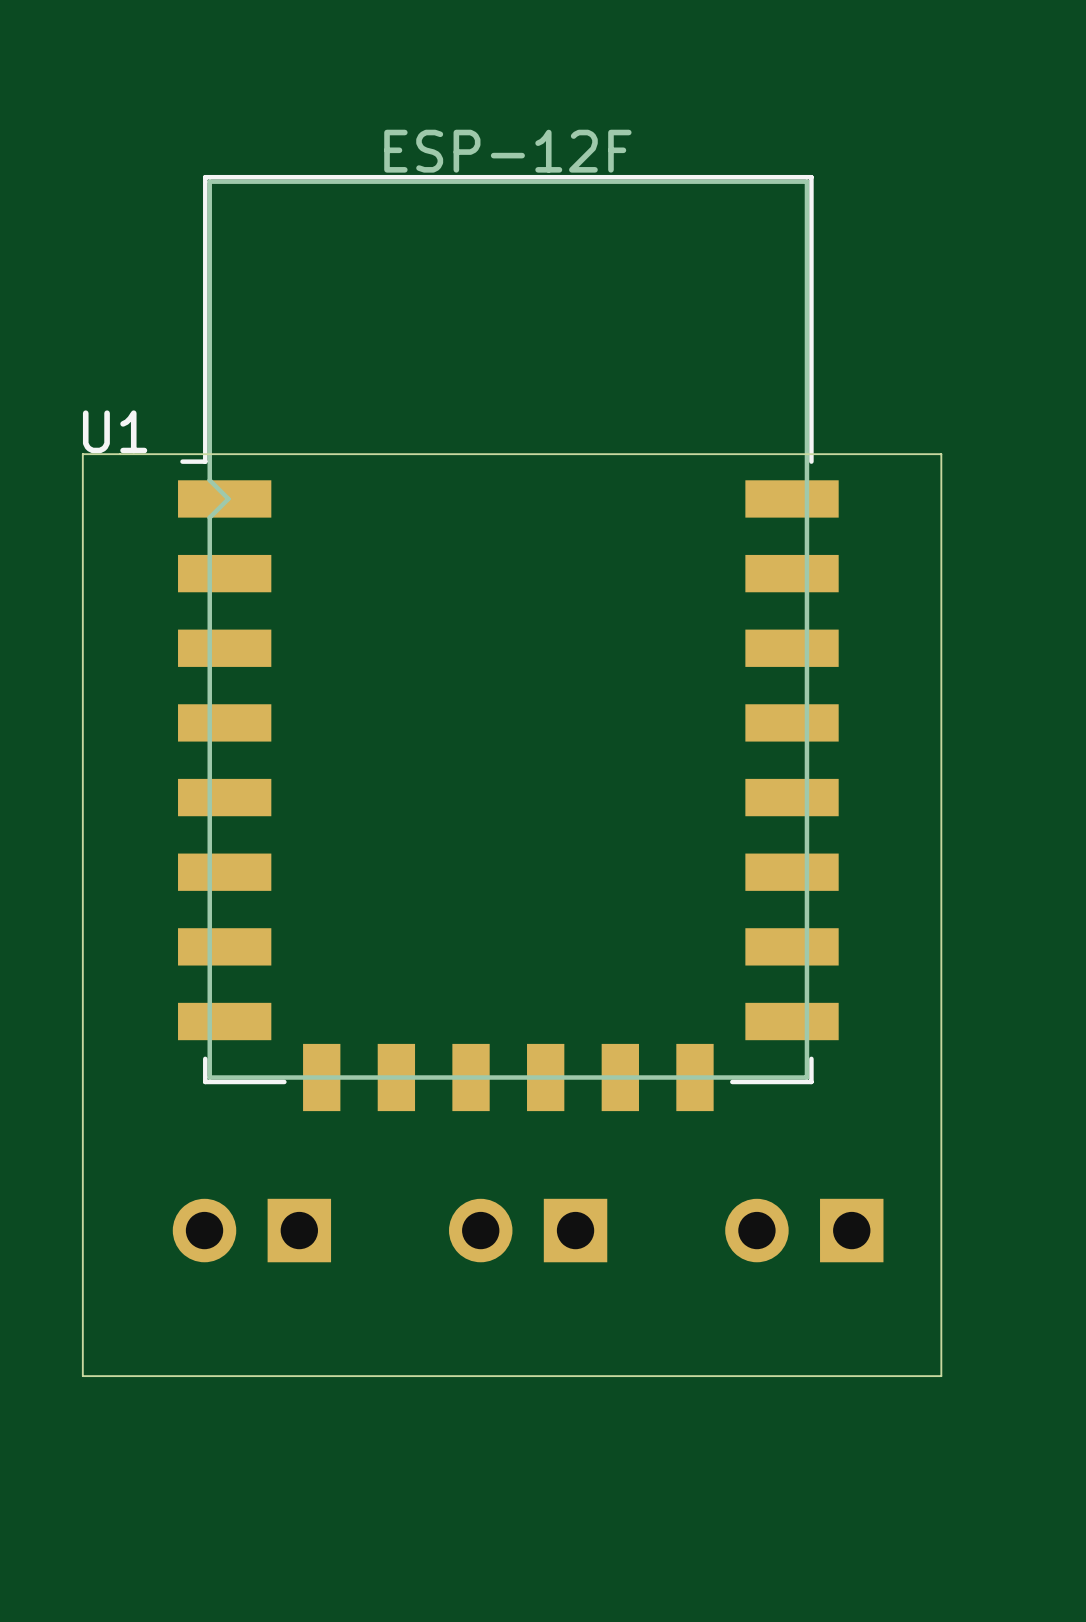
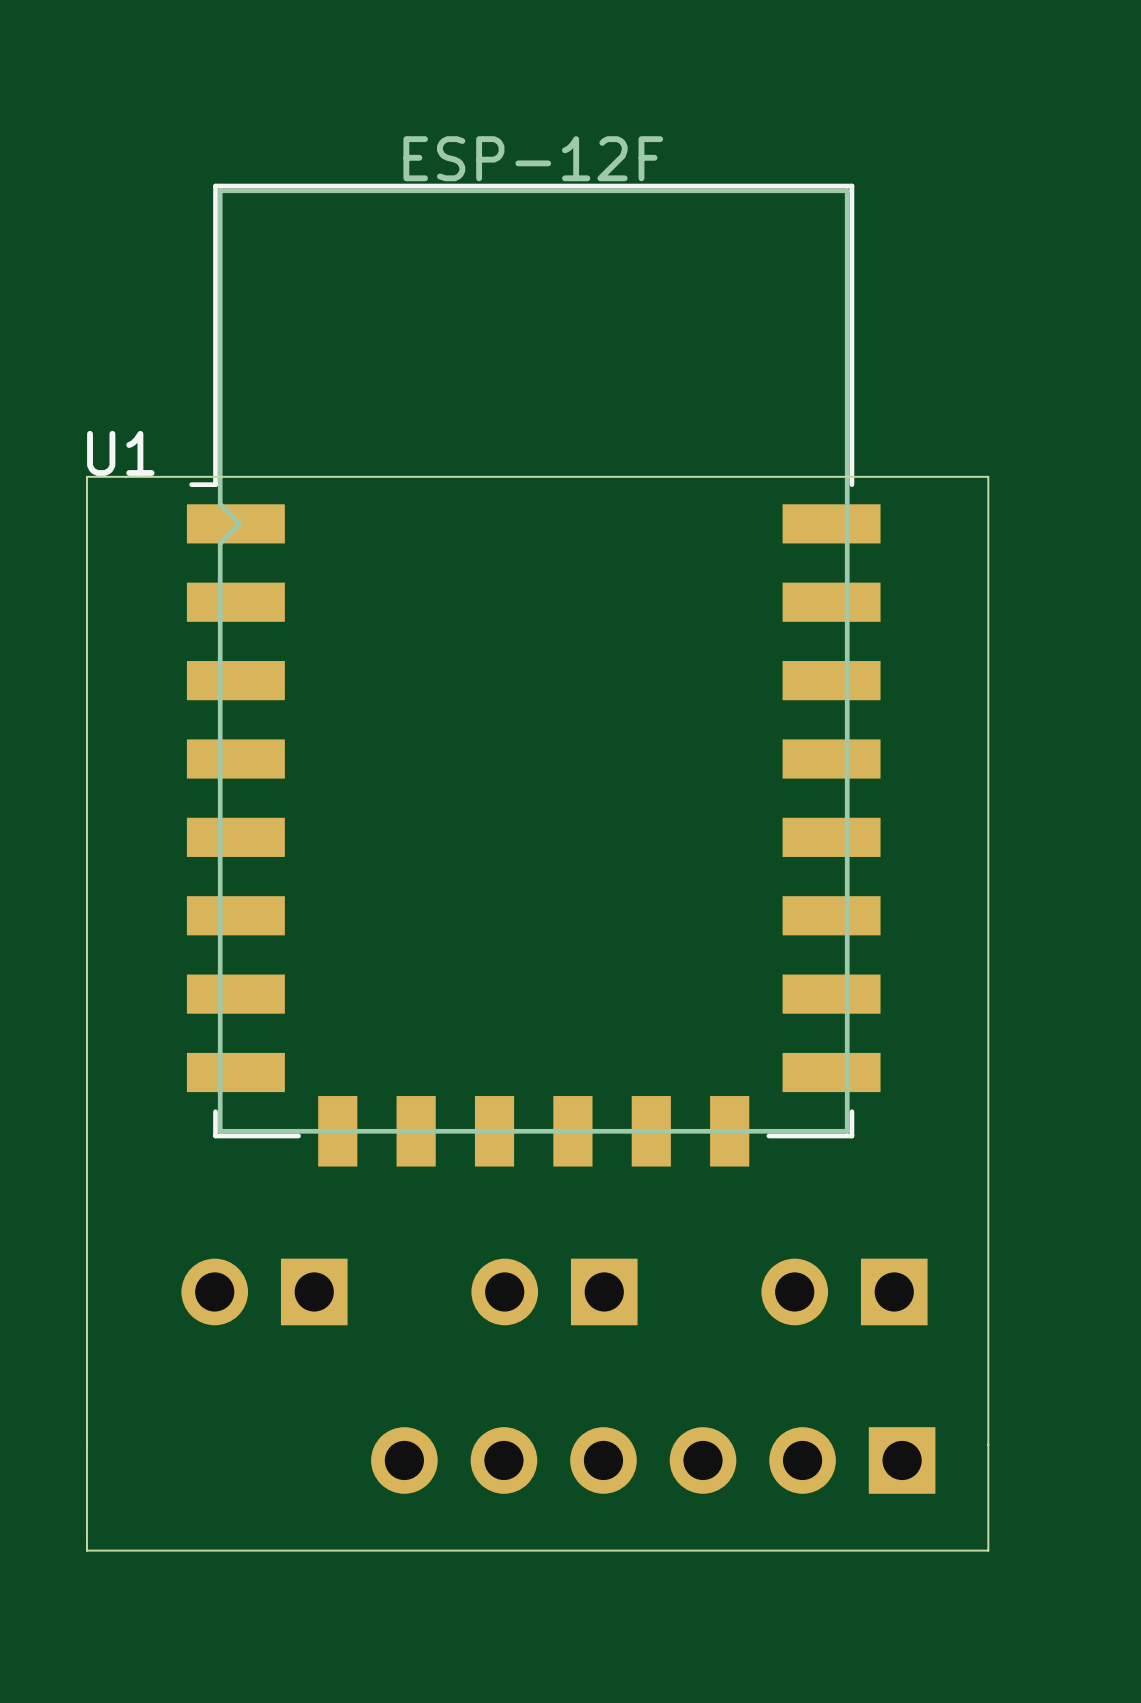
board edge: (941, 1376) (82, 1376) -> (988, 1444) (988, 1550) (86, 1550) (86, 1444)
part: none -> (653, 1460)

